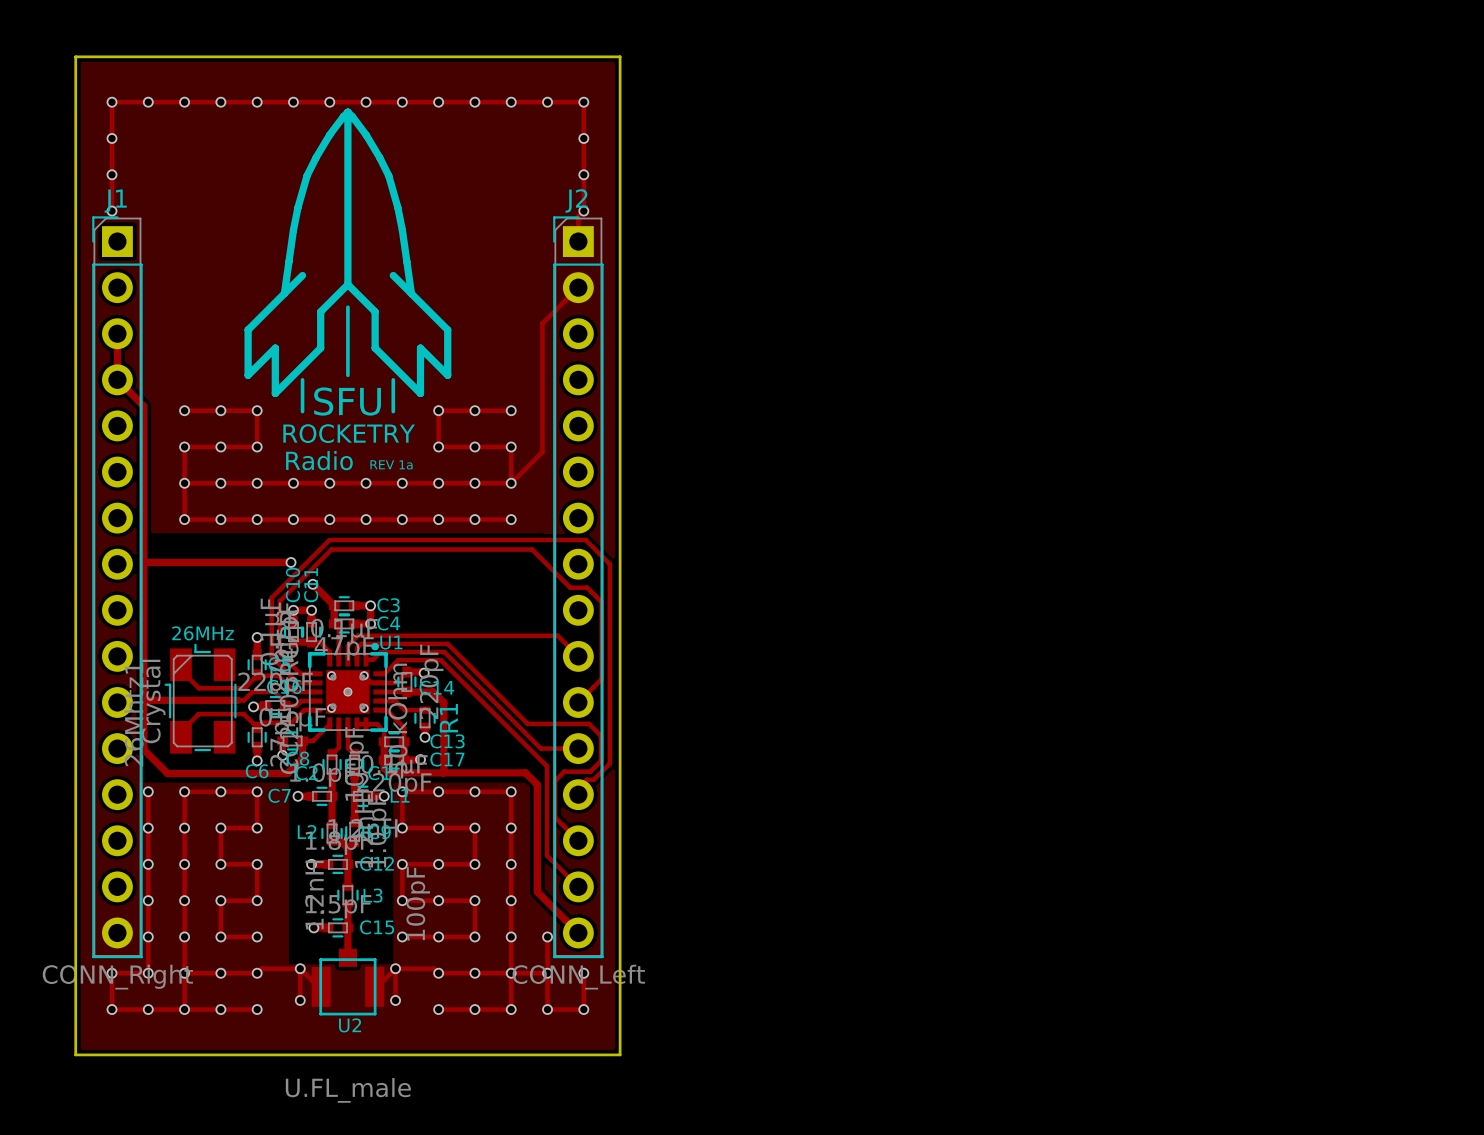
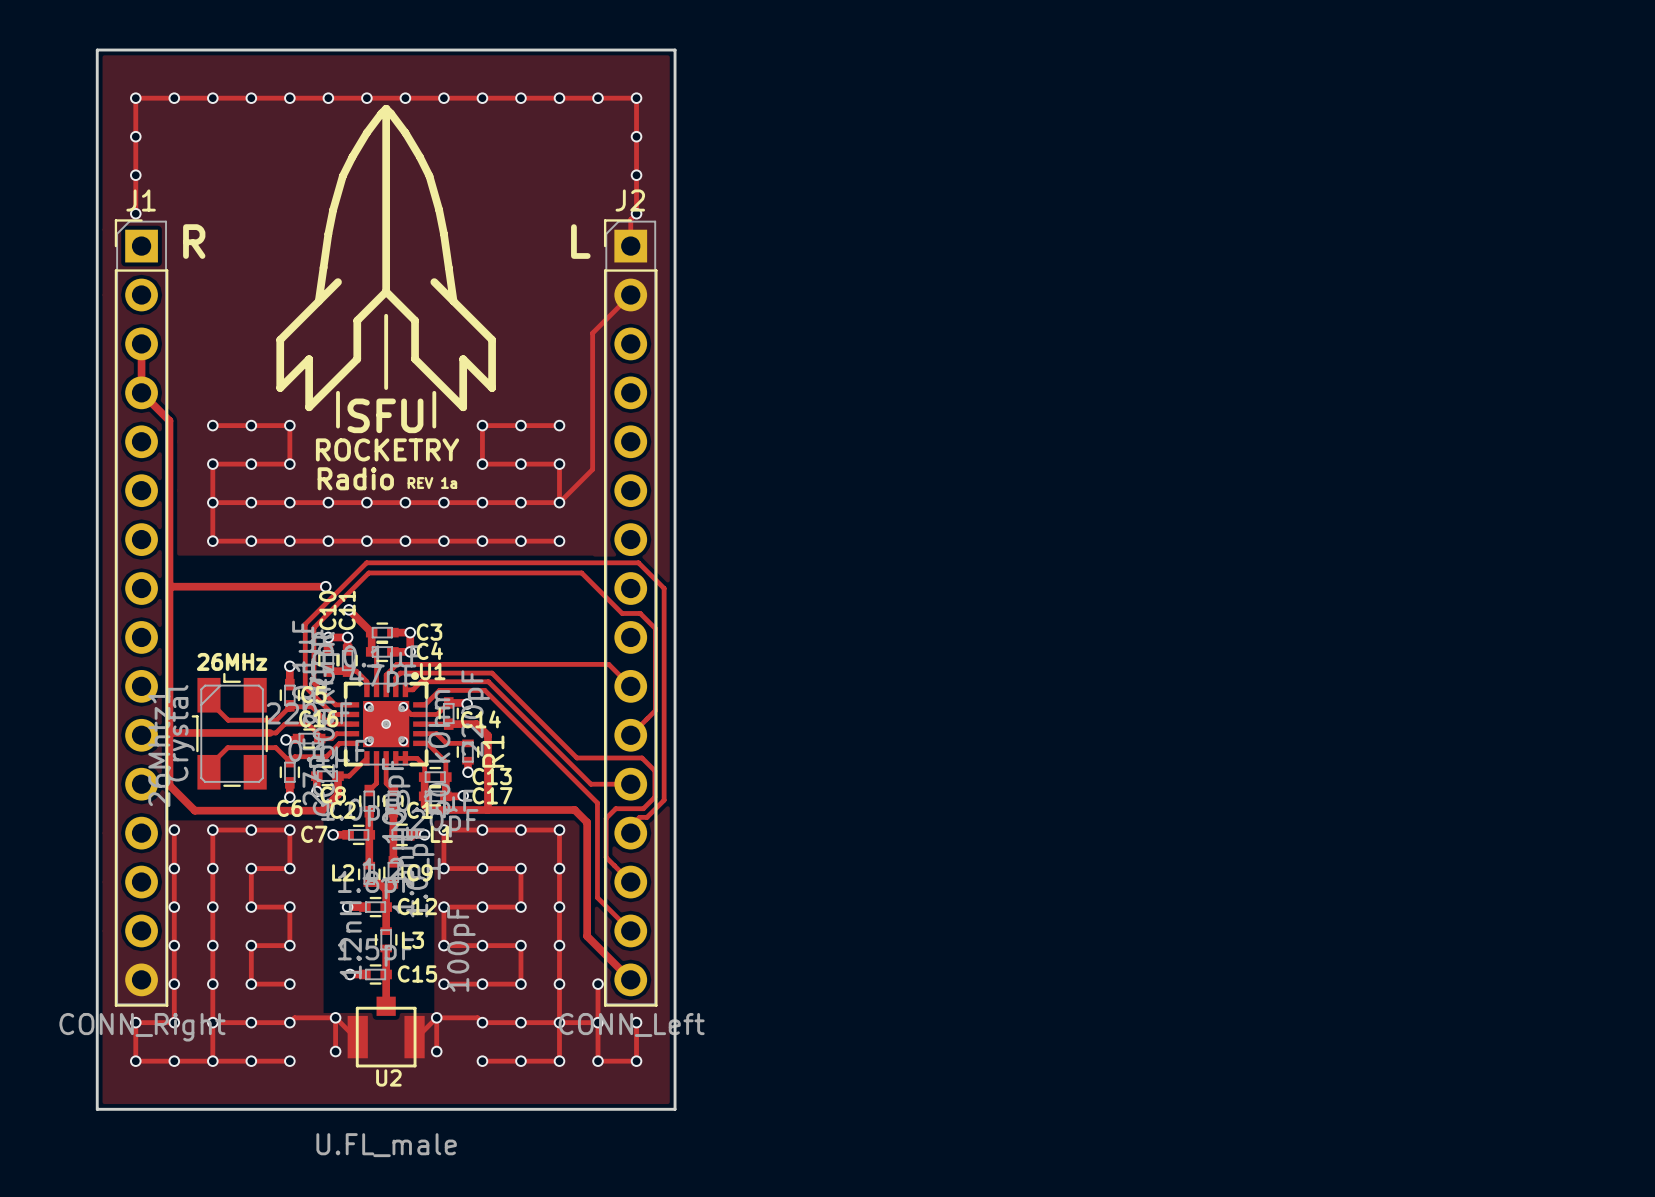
text: none -> R (194, 241)
text: none -> L (580, 241)

